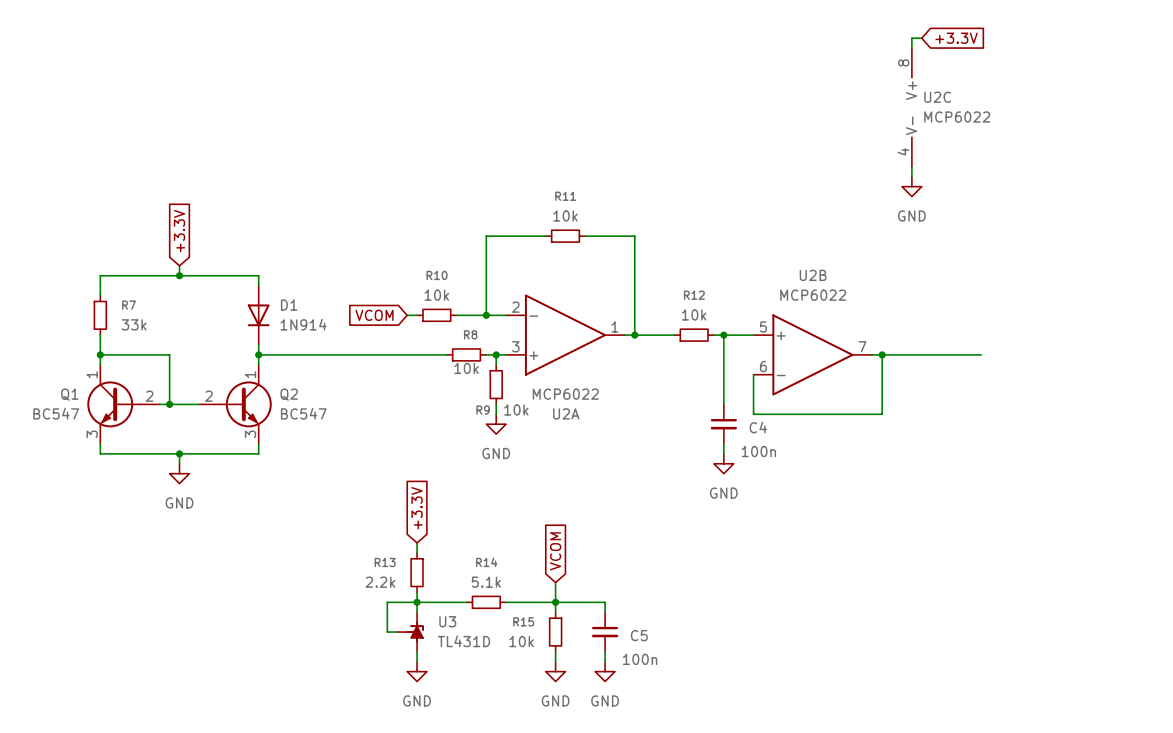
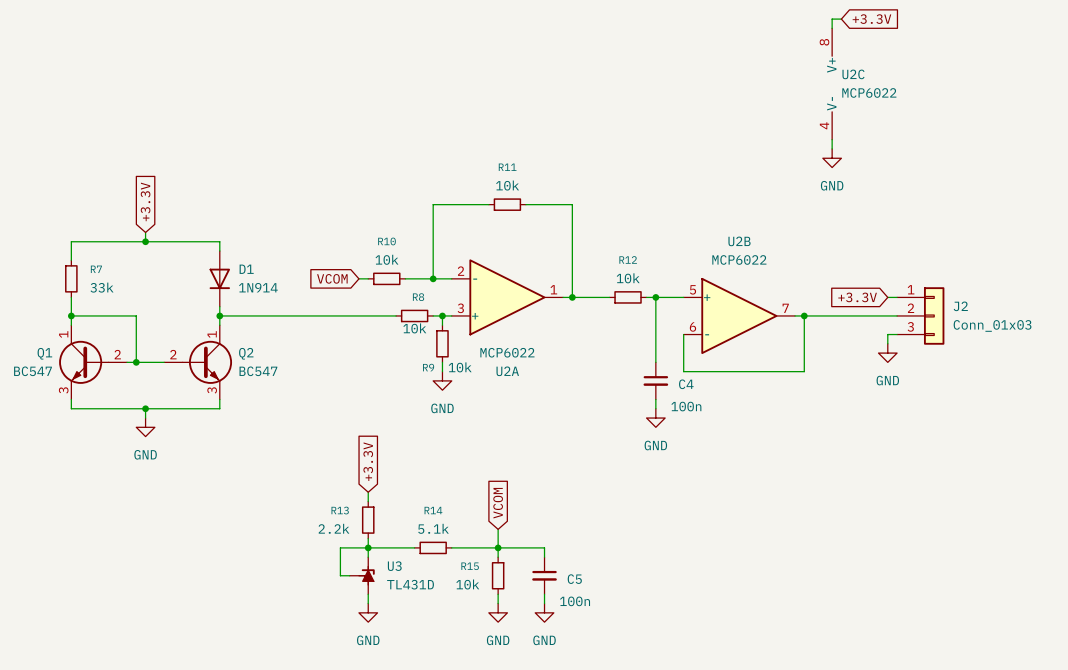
global label: none -> +3.3V (857, 297)
wire: none -> (887, 297) (897, 297)
J2: none -> Conn_01x03 (920, 315)
wire: none -> (897, 334) (887, 334) (887, 343)
power symbol: none -> GND (887, 353)

